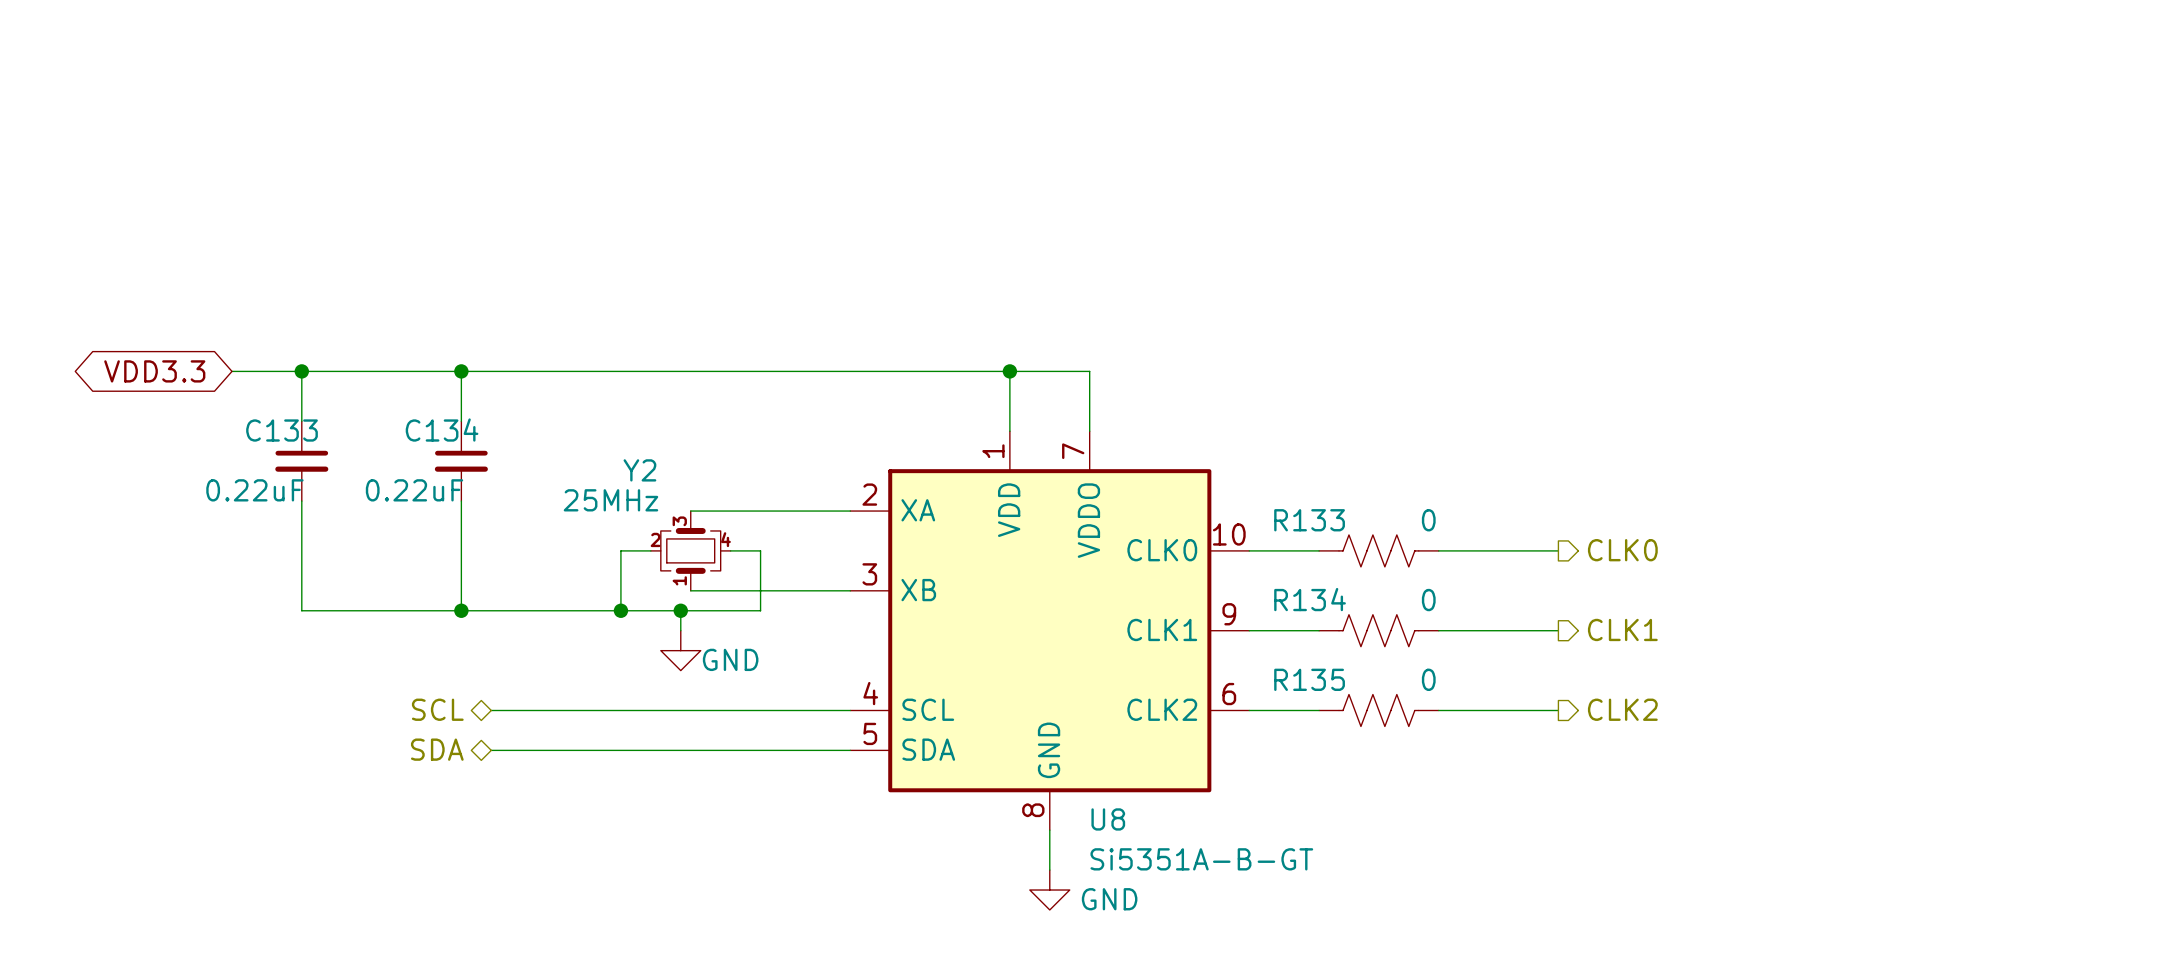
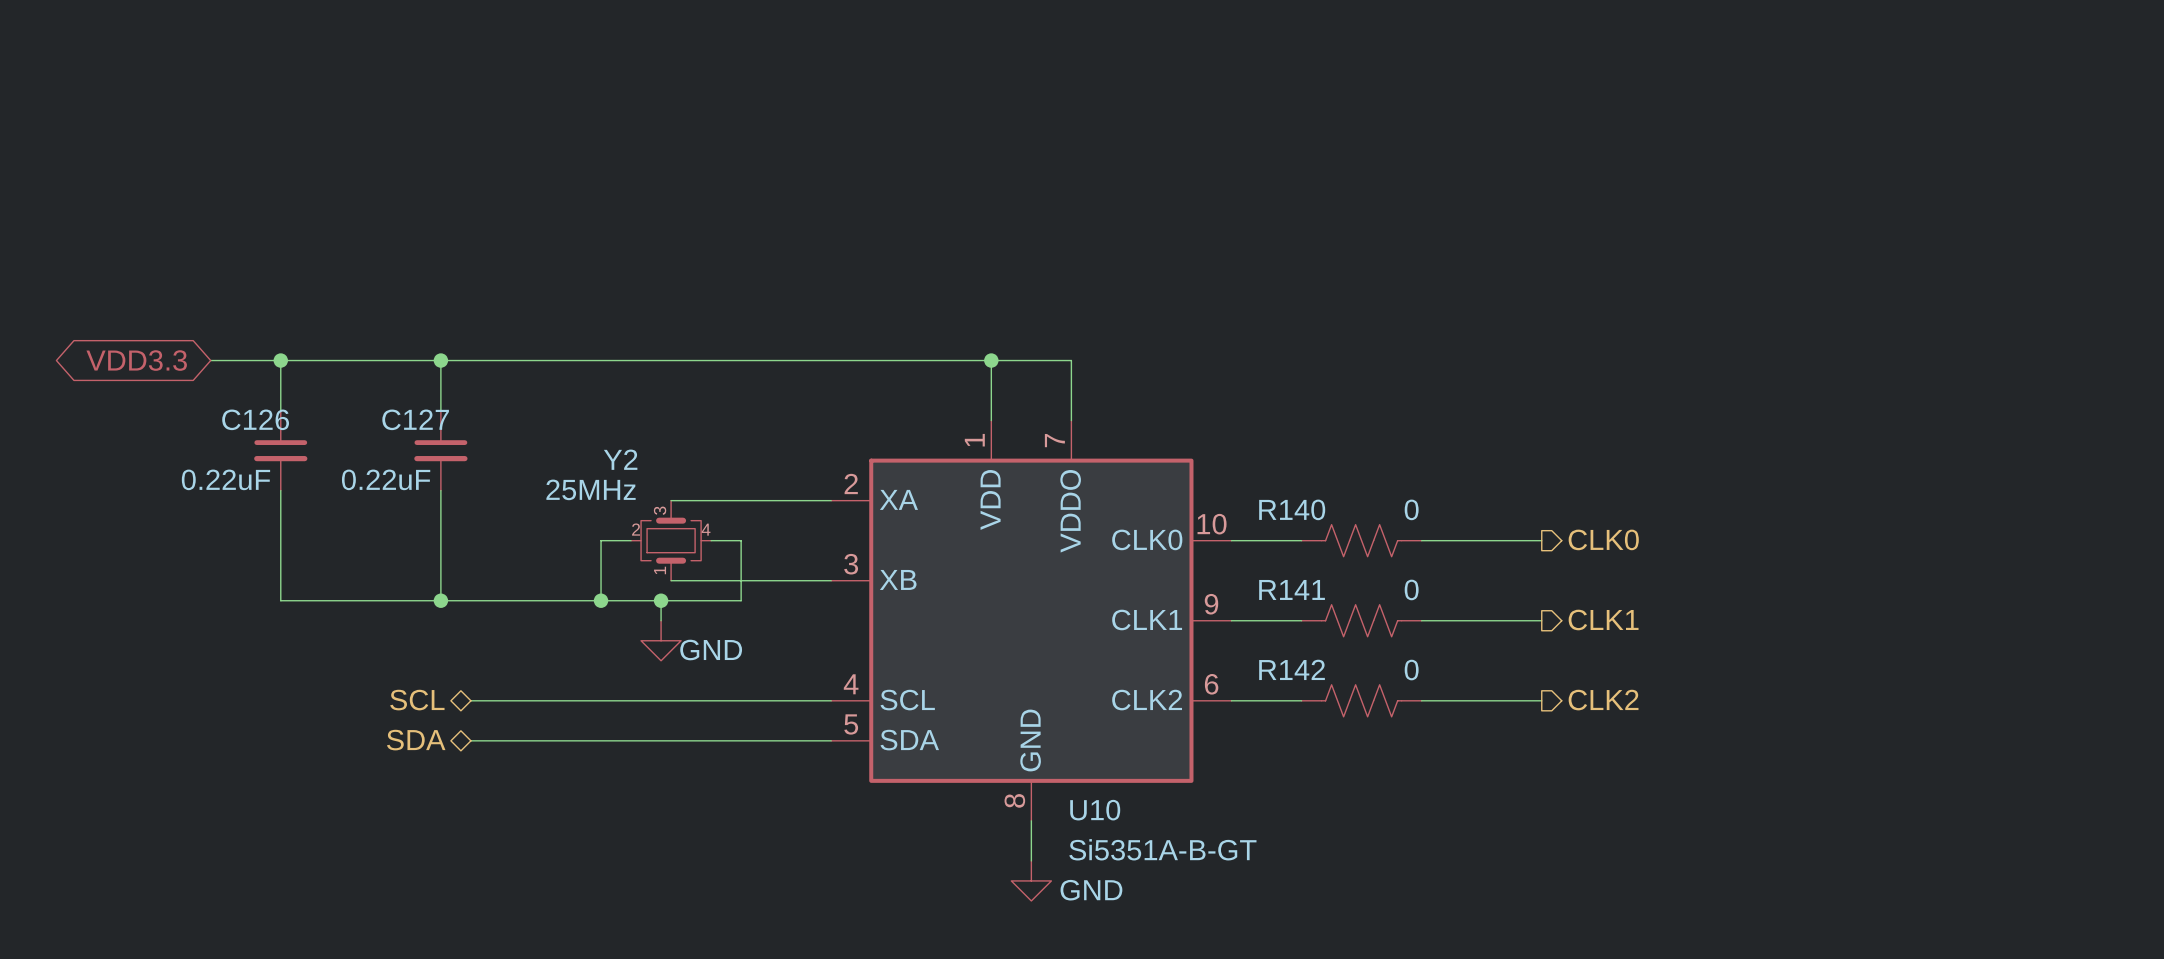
C133 name: C133 (282, 430) -> C126 (255, 419)
C134 name: C134 (442, 430) -> C127 (415, 419)
R133 name: R133 (1309, 520) -> R140 (1292, 509)
R134 name: R134 (1310, 599) -> R141 (1292, 589)
R135 name: R135 (1309, 679) -> R142 (1292, 669)
U8 name: U8 (1108, 819) -> U10 (1095, 810)

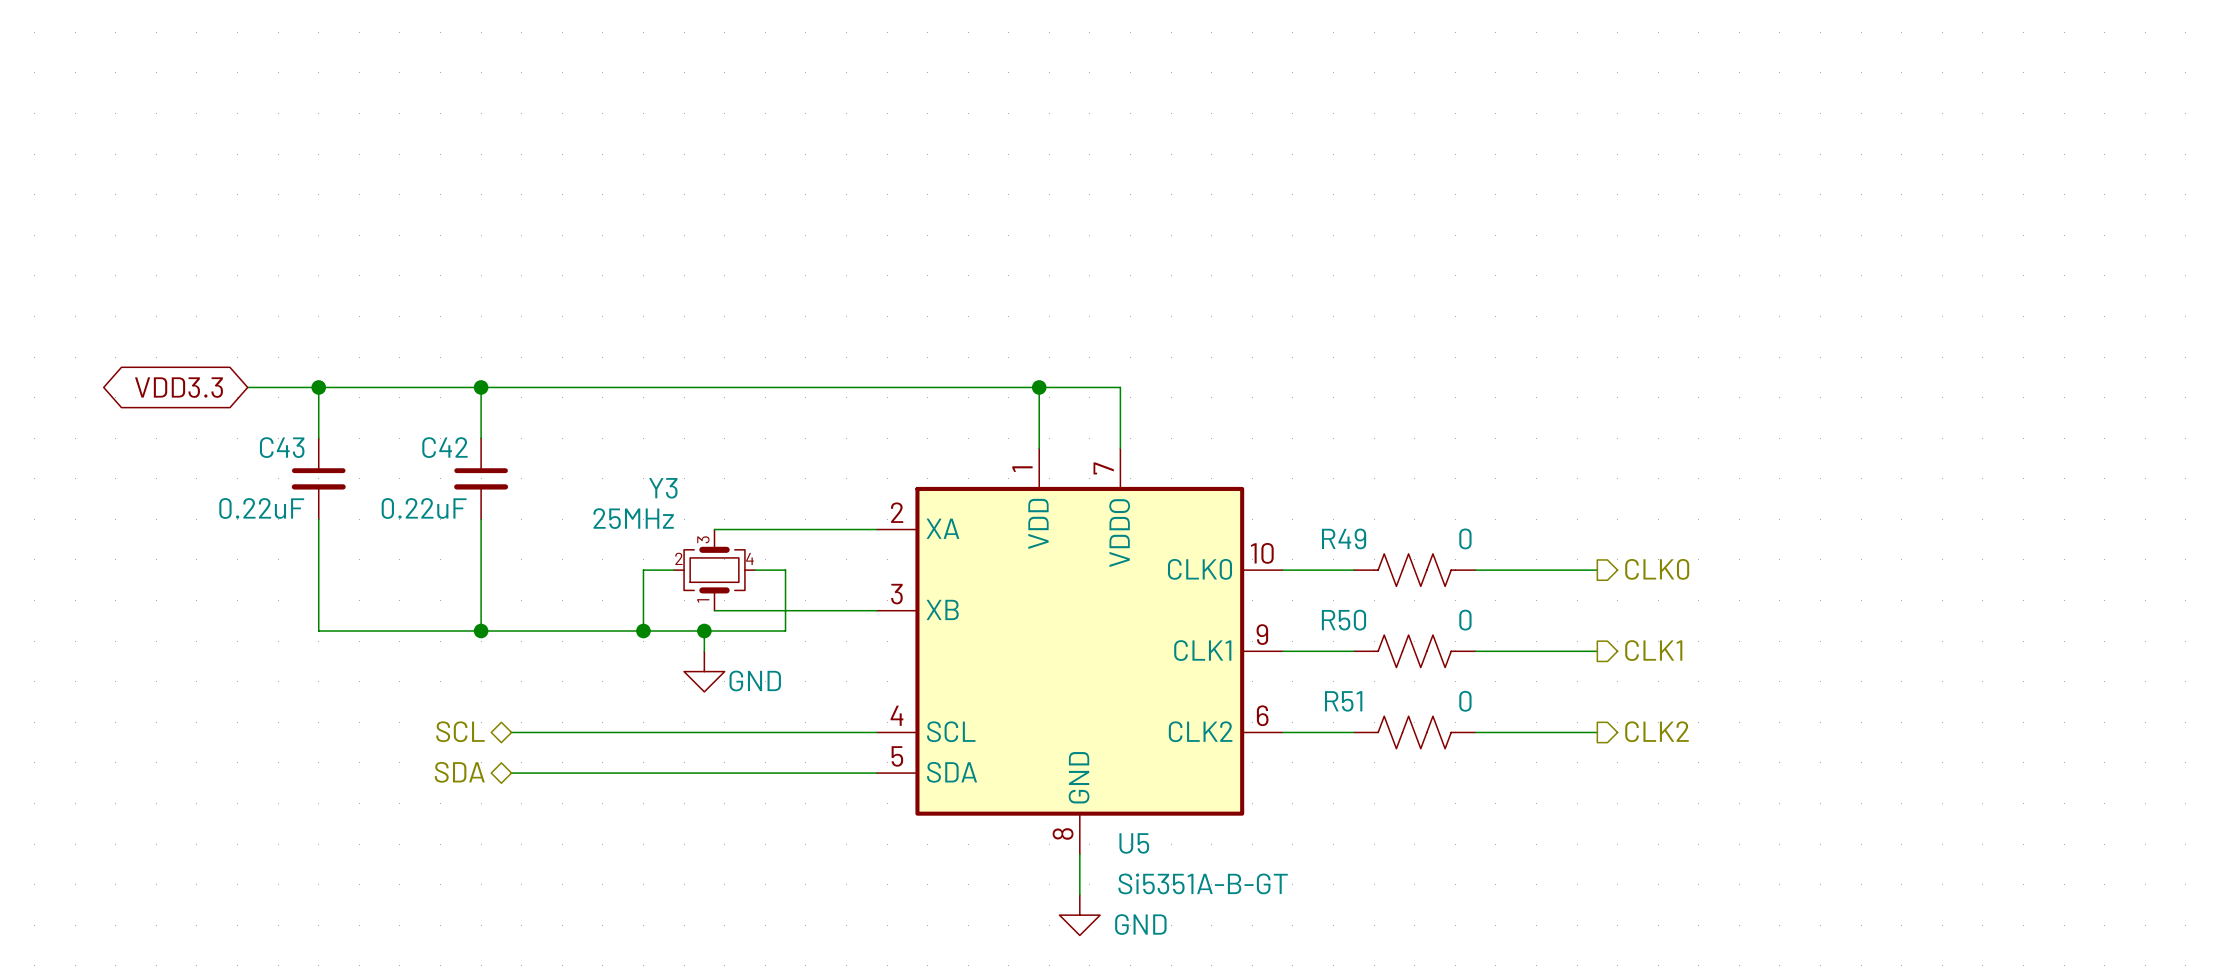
C126 name: C126 (255, 419) -> C43 (282, 447)
C127 name: C127 (415, 419) -> C42 (444, 447)
Y2 name: Y2 (620, 459) -> Y3 (663, 488)
R140 name: R140 (1292, 509) -> R49 (1344, 538)
R141 name: R141 (1292, 589) -> R50 (1343, 620)
R142 name: R142 (1292, 669) -> R51 (1343, 701)
U10 name: U10 (1095, 810) -> U5 (1134, 843)

